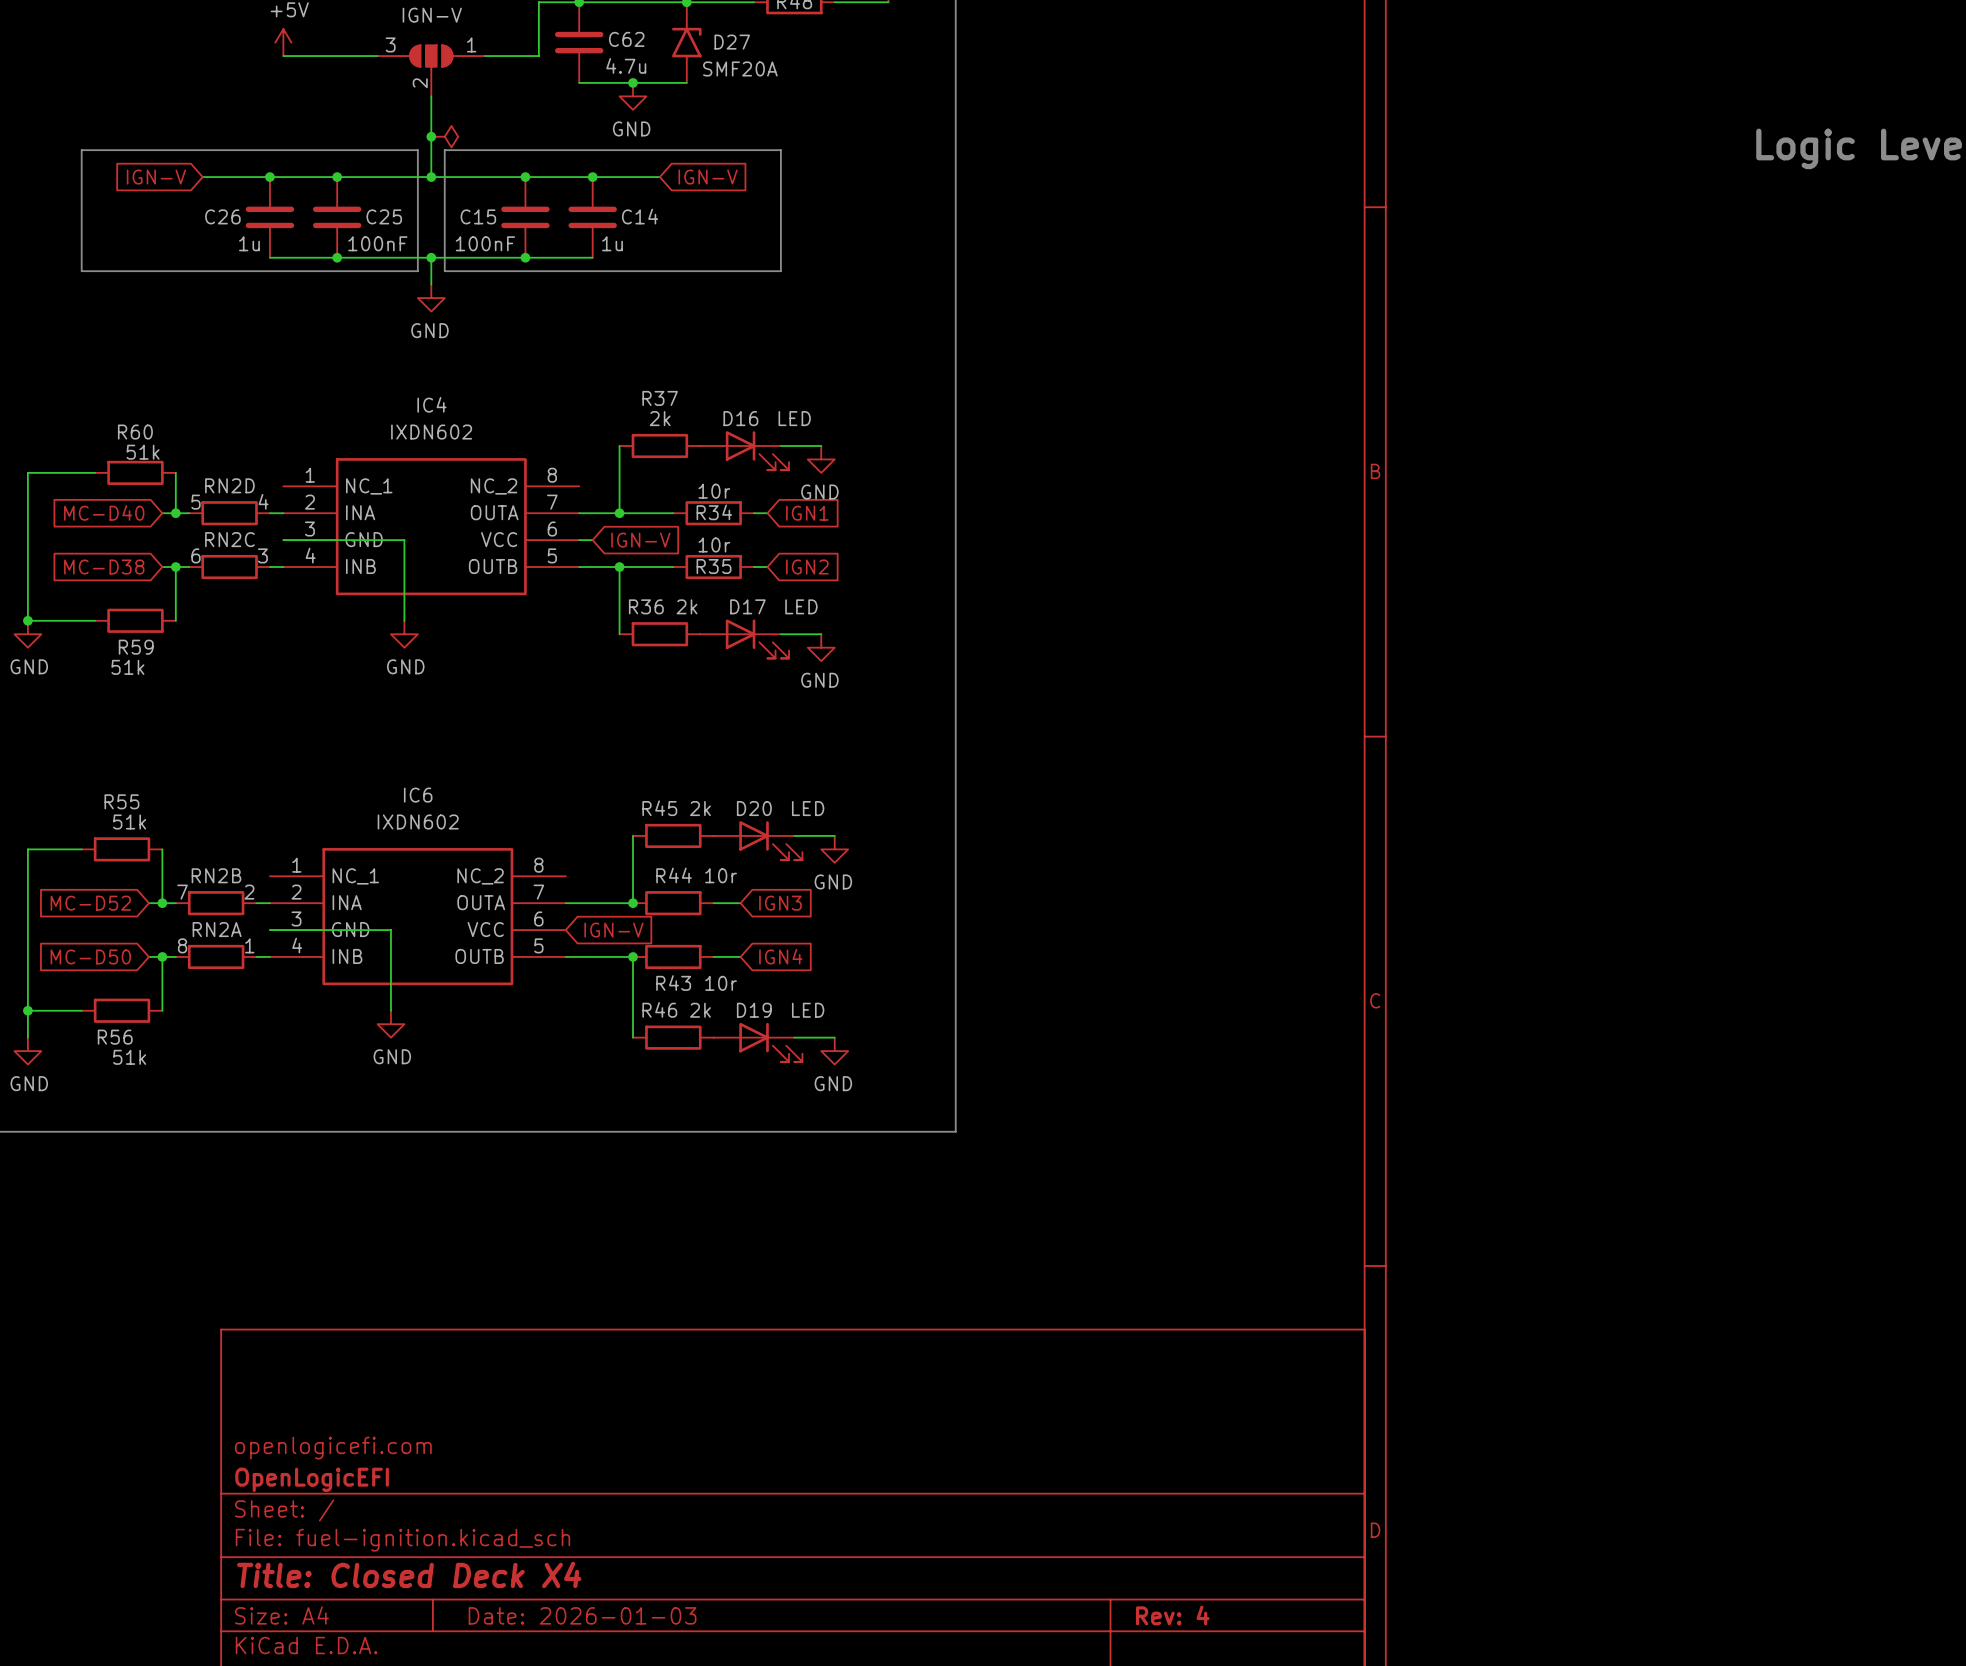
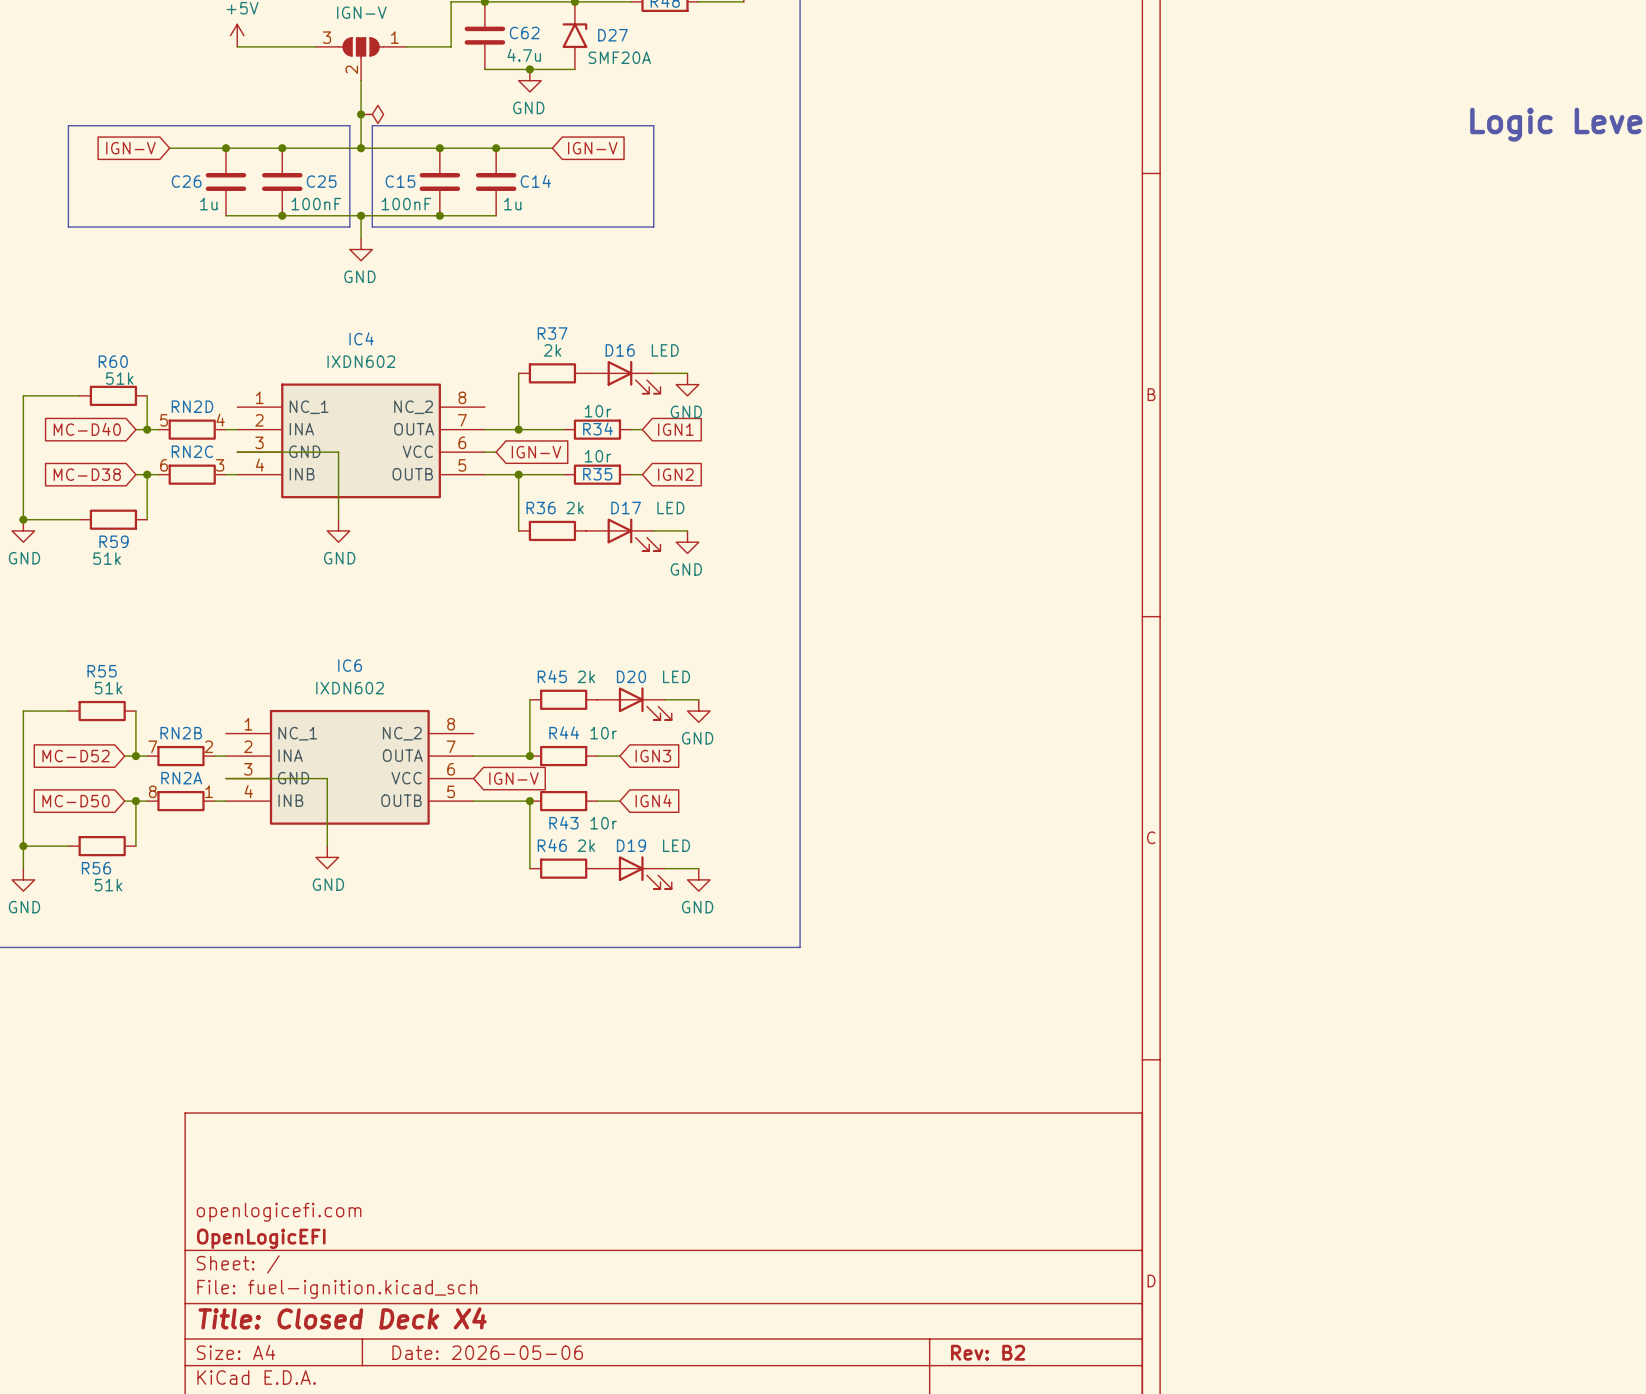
title block: Date: 2026-01-03 (582, 1615) -> Date: 2026-05-06 (487, 1352)
title block: Rev: 4 (1172, 1615) -> Rev: B2 (988, 1352)

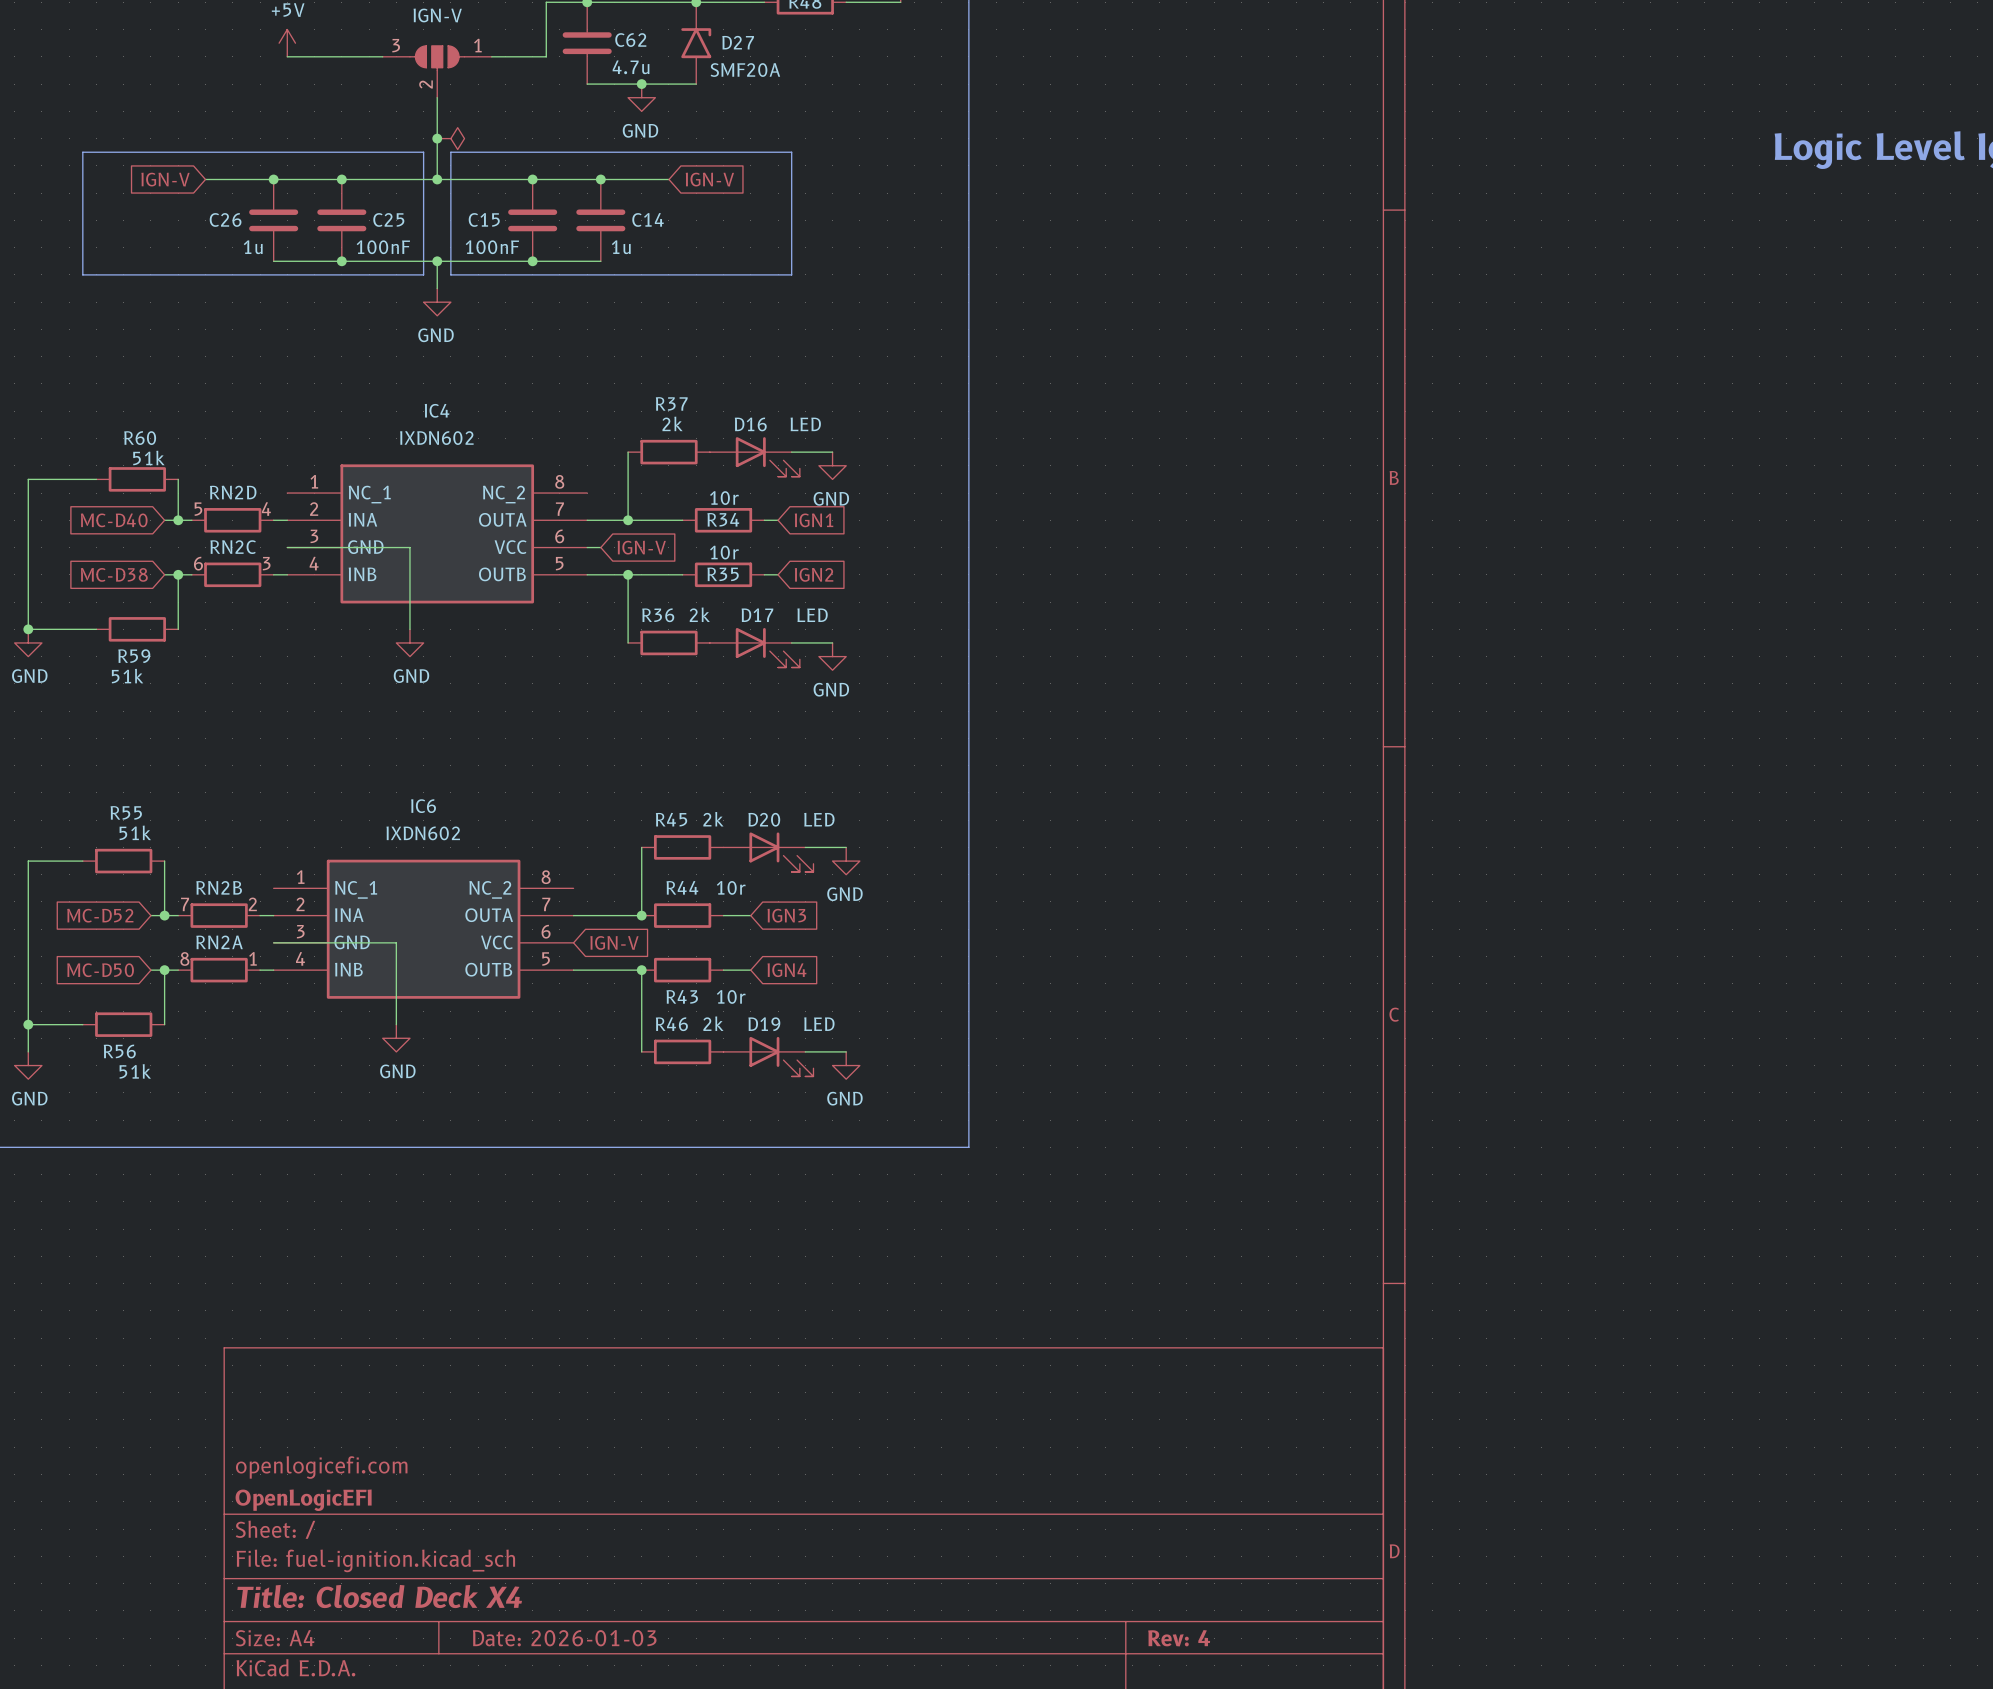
title block: Date: 2026-05-06 (487, 1352) -> Date: 2026-01-03 (564, 1638)
title block: Rev: B2 (988, 1352) -> Rev: 4 (1179, 1638)

